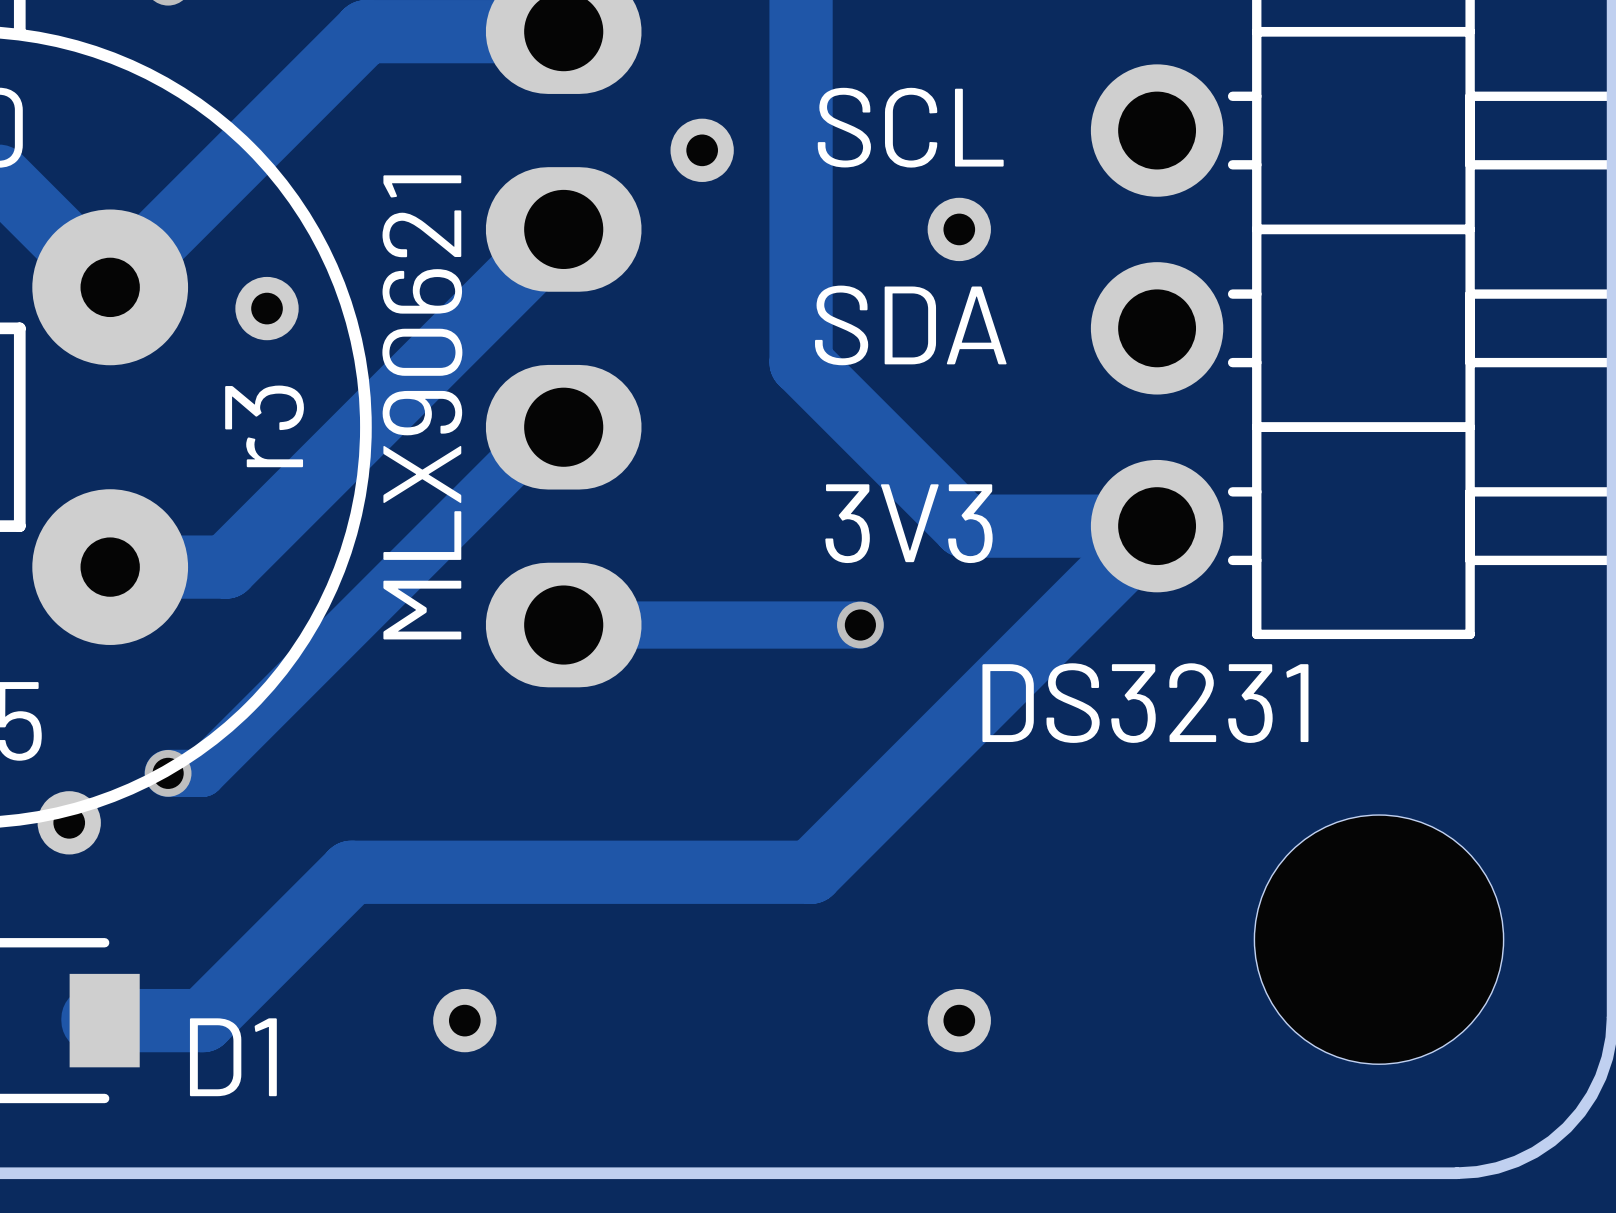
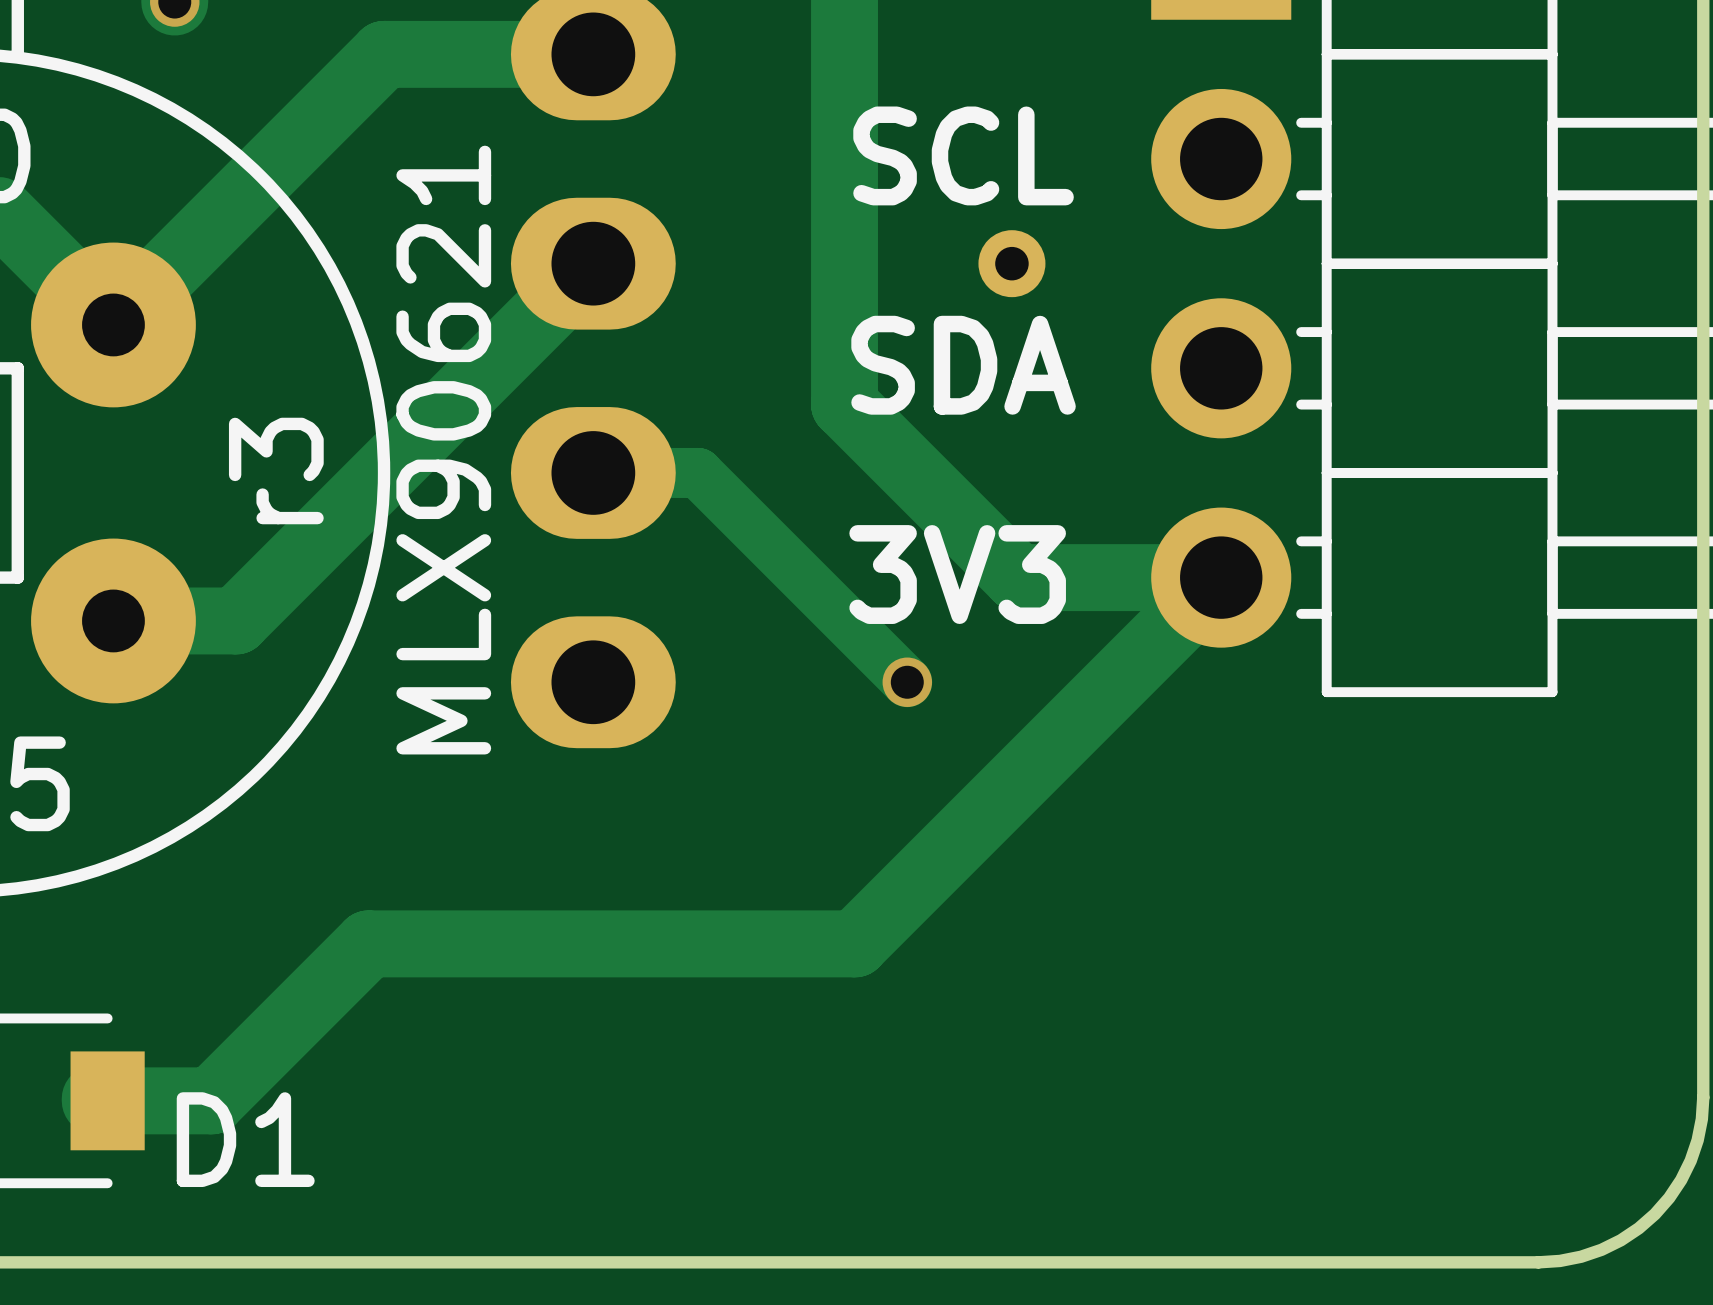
part: (702, 150) -> none
part: (267, 308) -> none
track: (548, 427) (202, 773) (168, 773) -> none
track: (563, 625) (860, 625) -> (593, 472) (698, 472) (907, 682)
part value: DS3231 (1145, 703) -> none
via: (168, 773) -> none
part: (69, 822) -> none
part: (1379, 939) -> none
part: (464, 1020) -> none
part: (959, 1020) -> none

